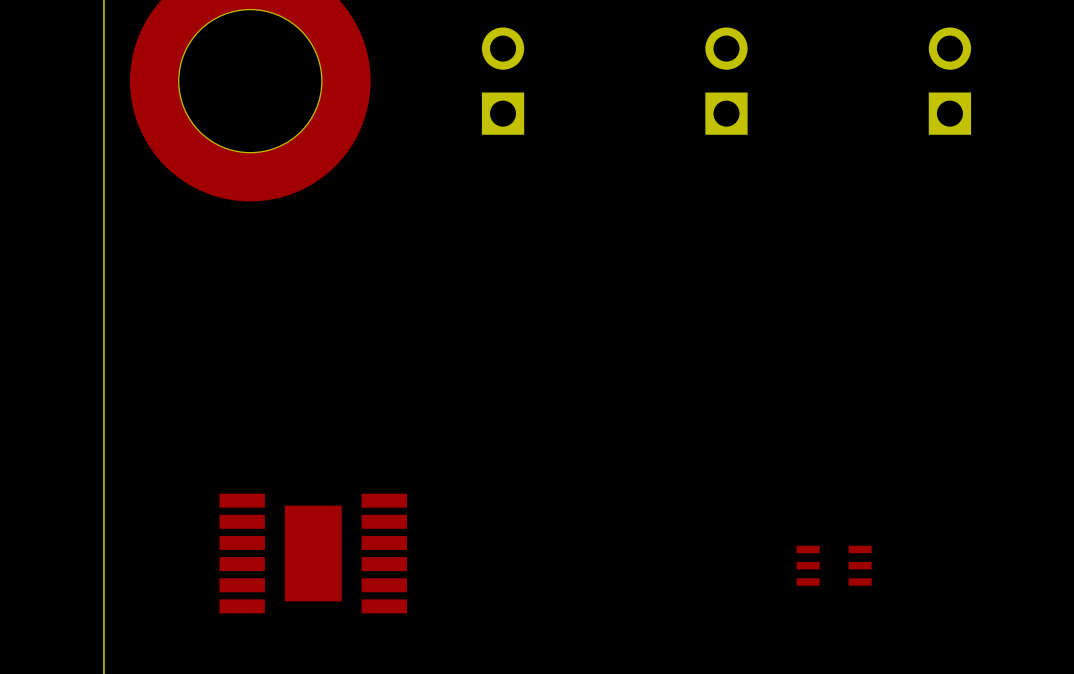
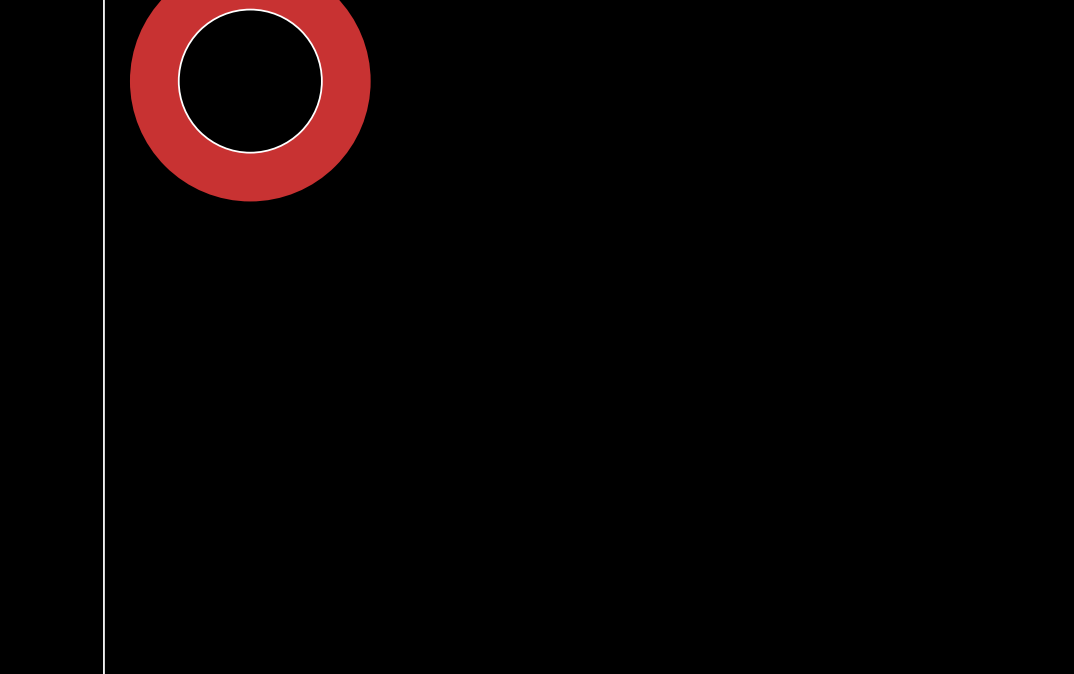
part: (503, 81) -> none
part: (726, 81) -> none
part: (949, 81) -> none
part: (313, 553) -> none
part: (834, 565) -> none

